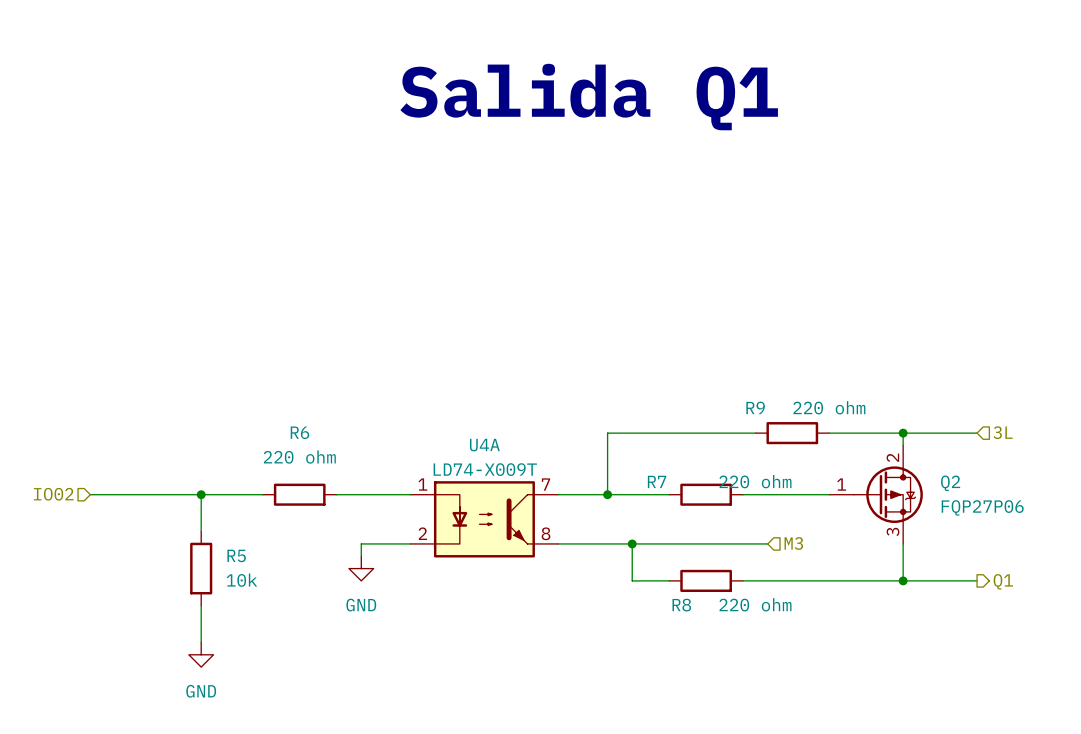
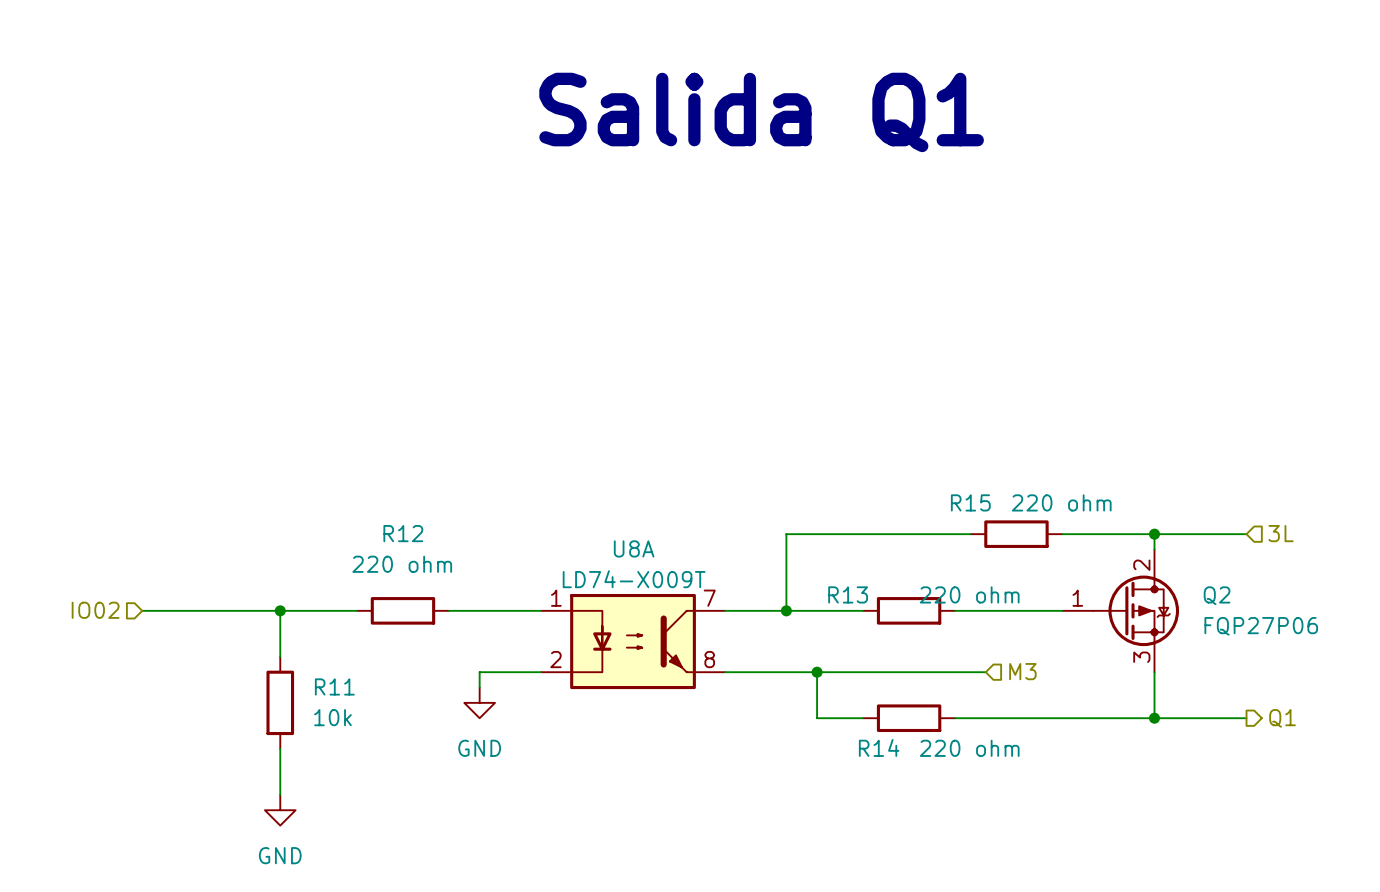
R9 name: R9 (755, 407) -> R15 (970, 502)
R6 name: R6 (299, 432) -> R12 (403, 533)
U4A name: U4A (484, 445) -> U8A (634, 548)
R7 name: R7 (657, 481) -> R13 (848, 594)
R5 name: R5 (236, 555) -> R11 (334, 686)
R8 name: R8 (681, 605) -> R14 (879, 747)

